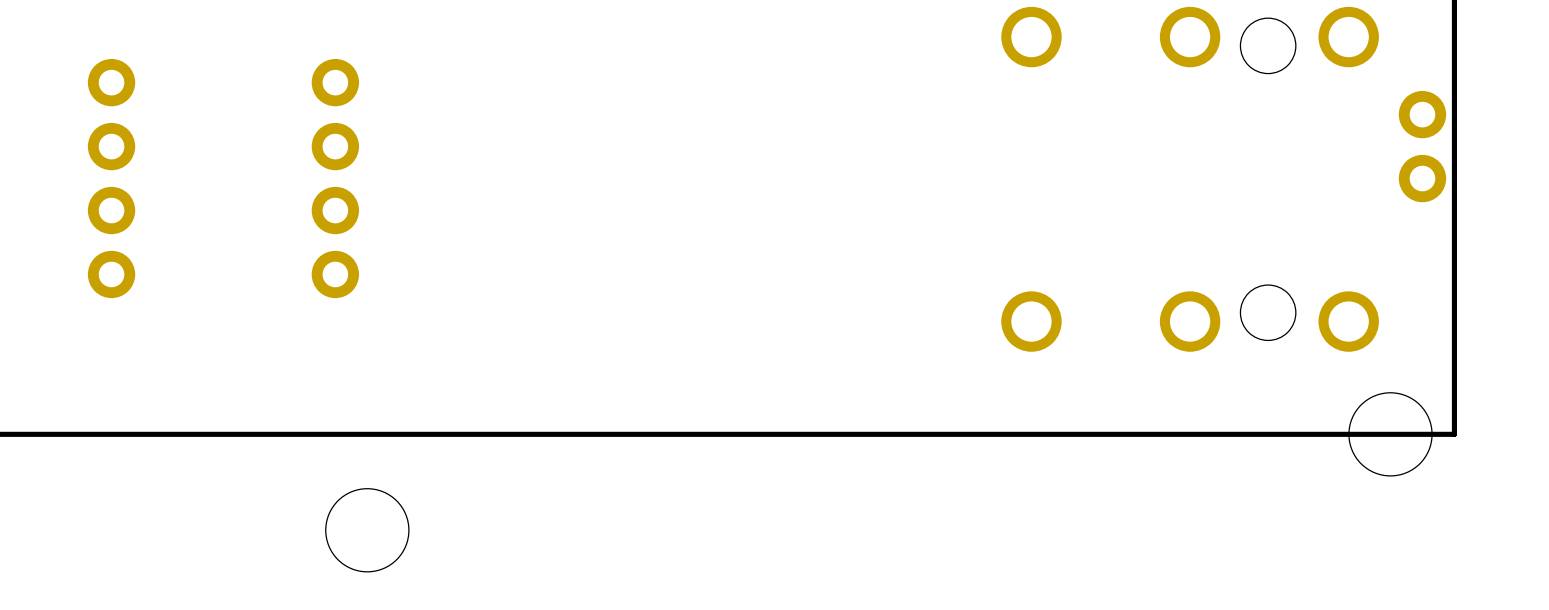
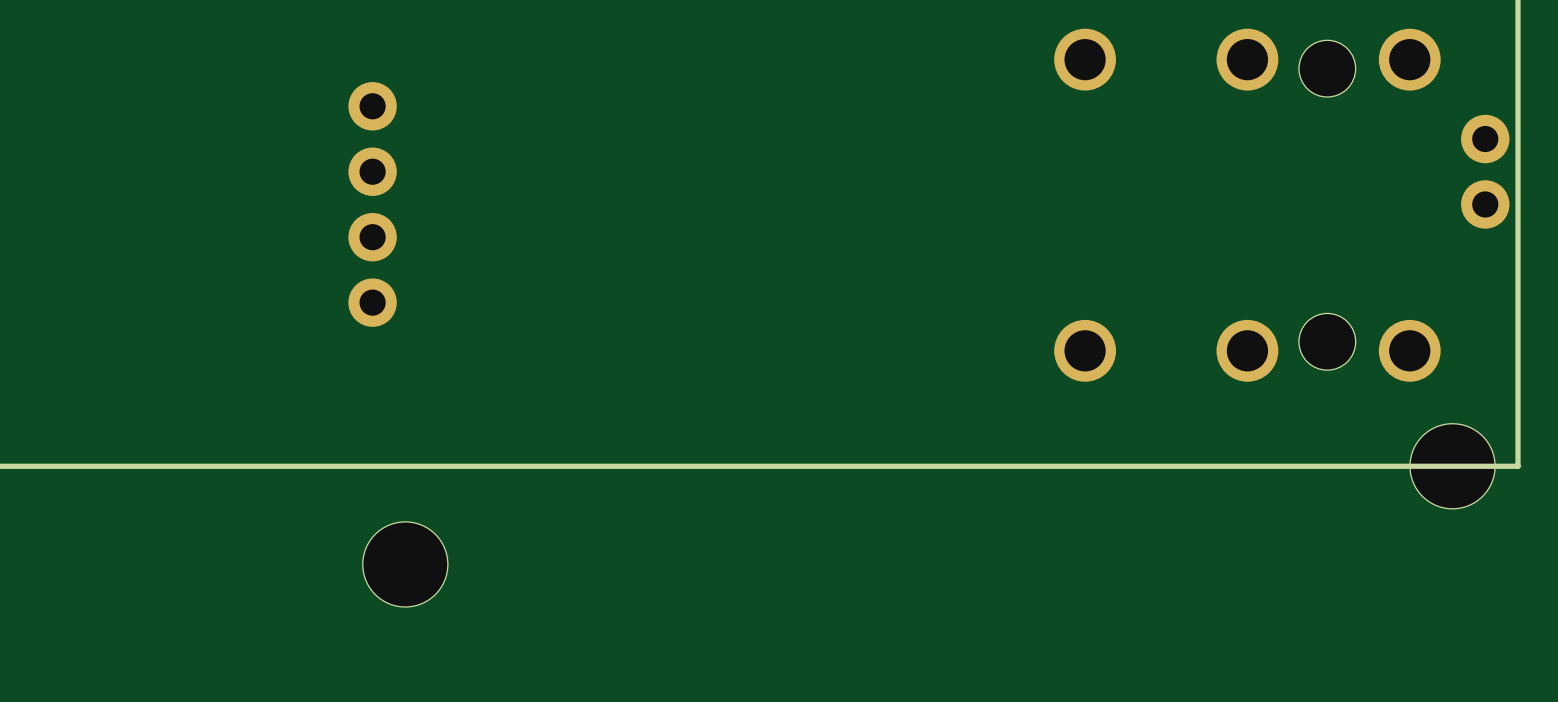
part: (111, 178) -> none

